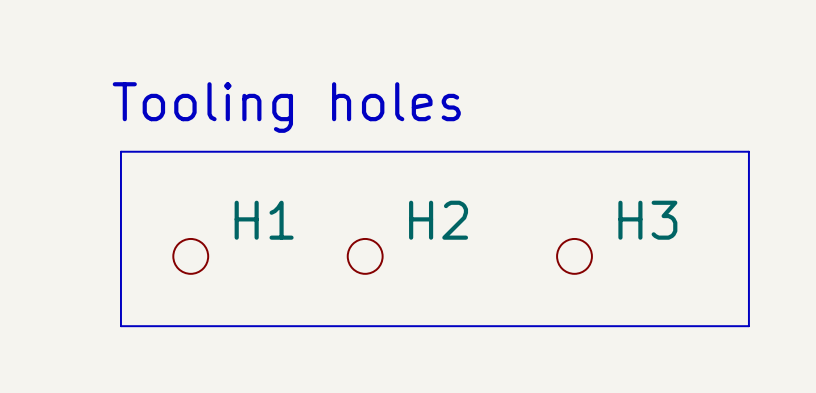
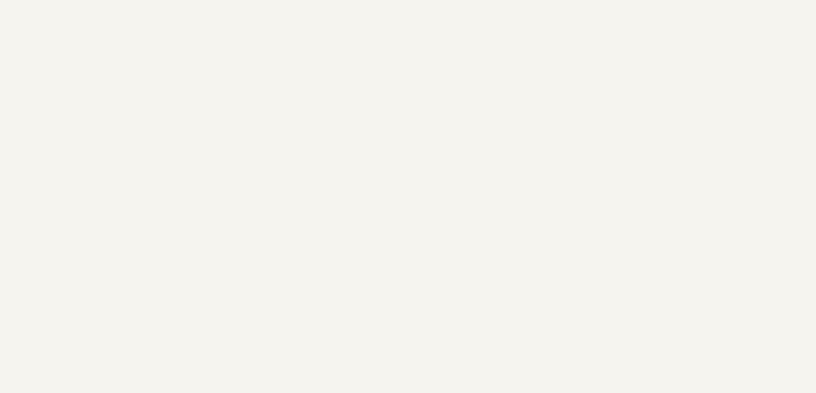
text: Tooling holes (286, 107) -> none
line: (120, 151) (748, 151) (748, 326) (120, 326) (120, 151) -> none
H1: (190, 256) -> none
H2: (365, 256) -> none
H3: (574, 256) -> none

